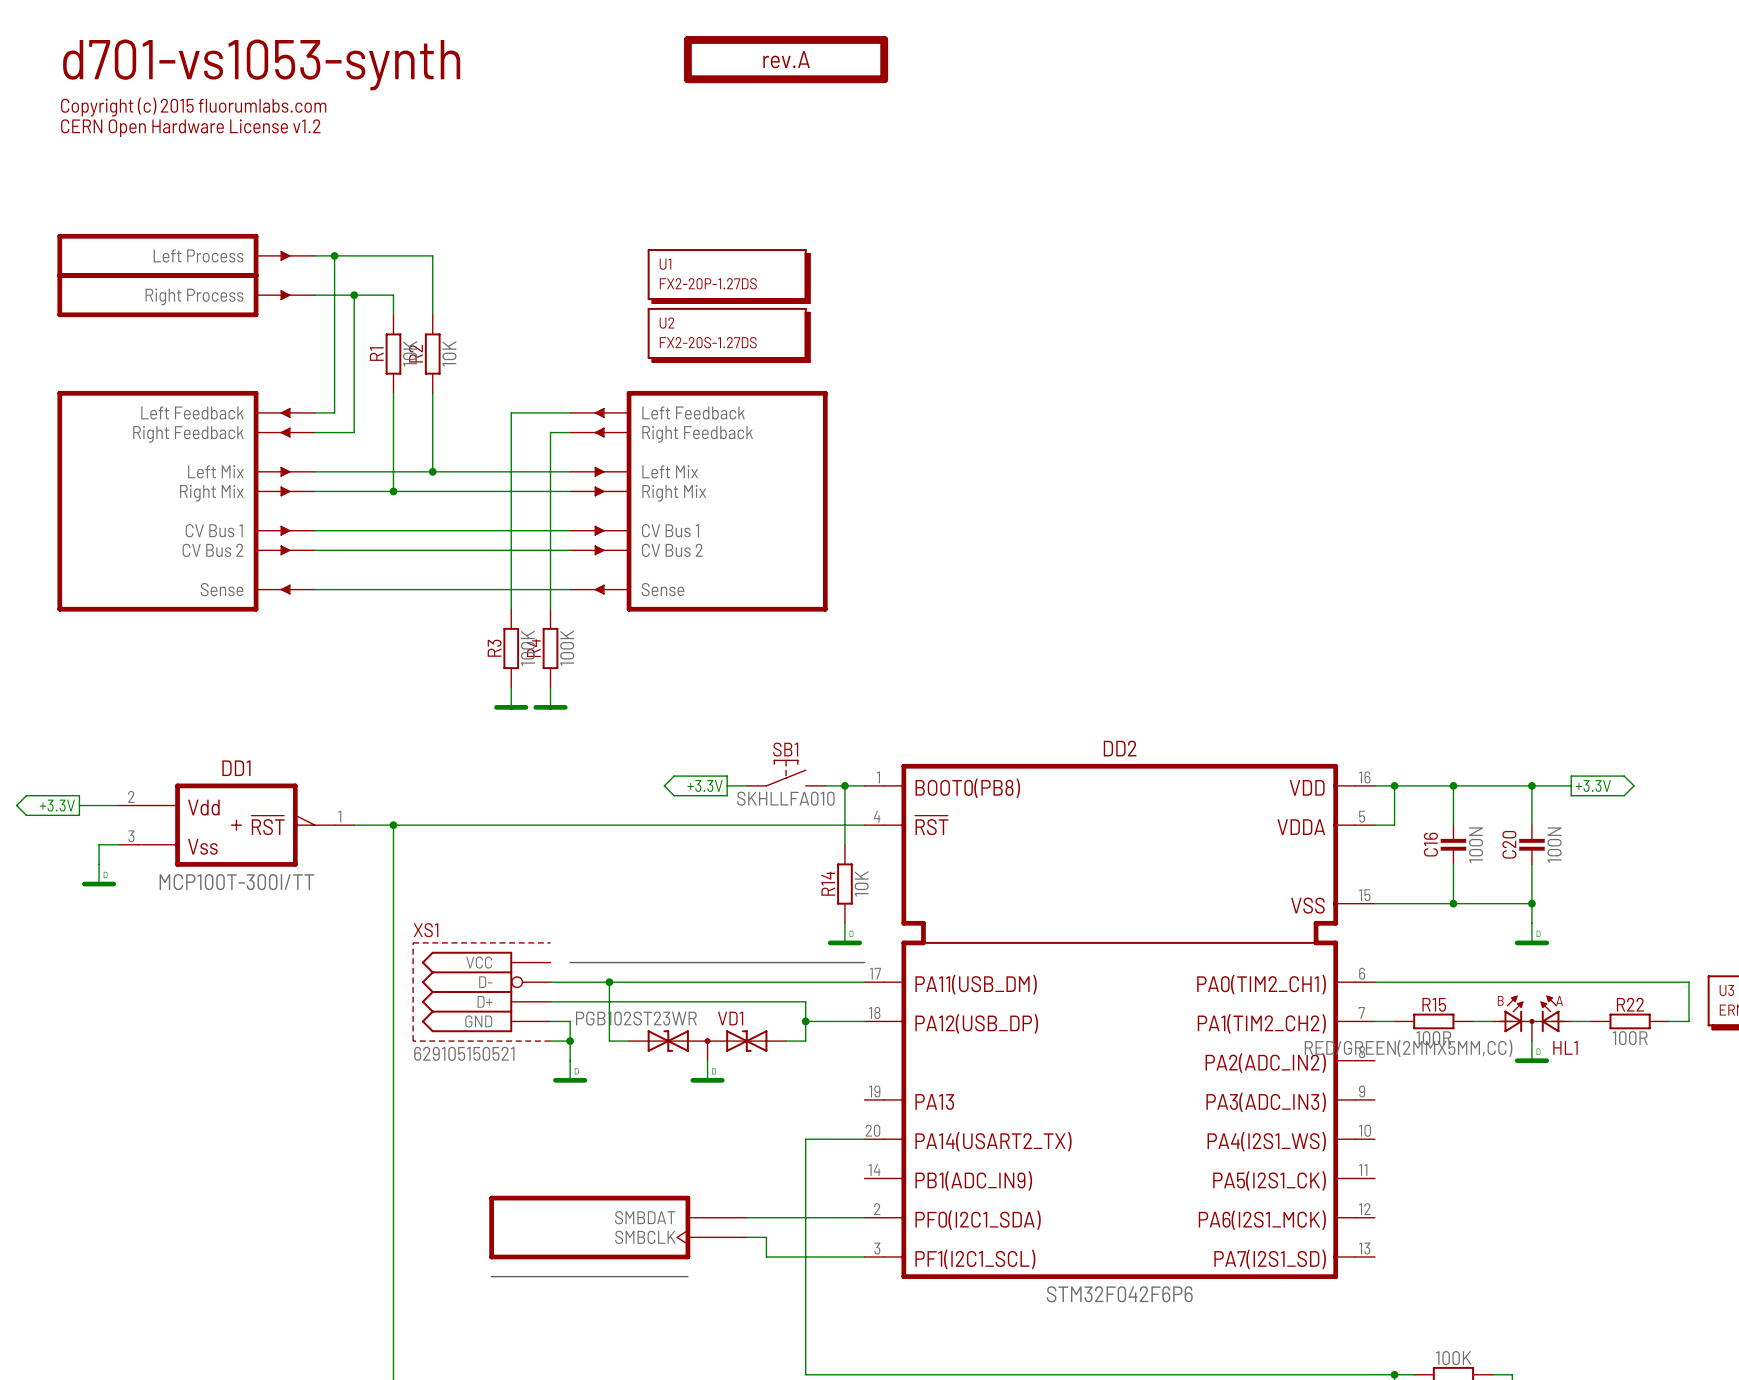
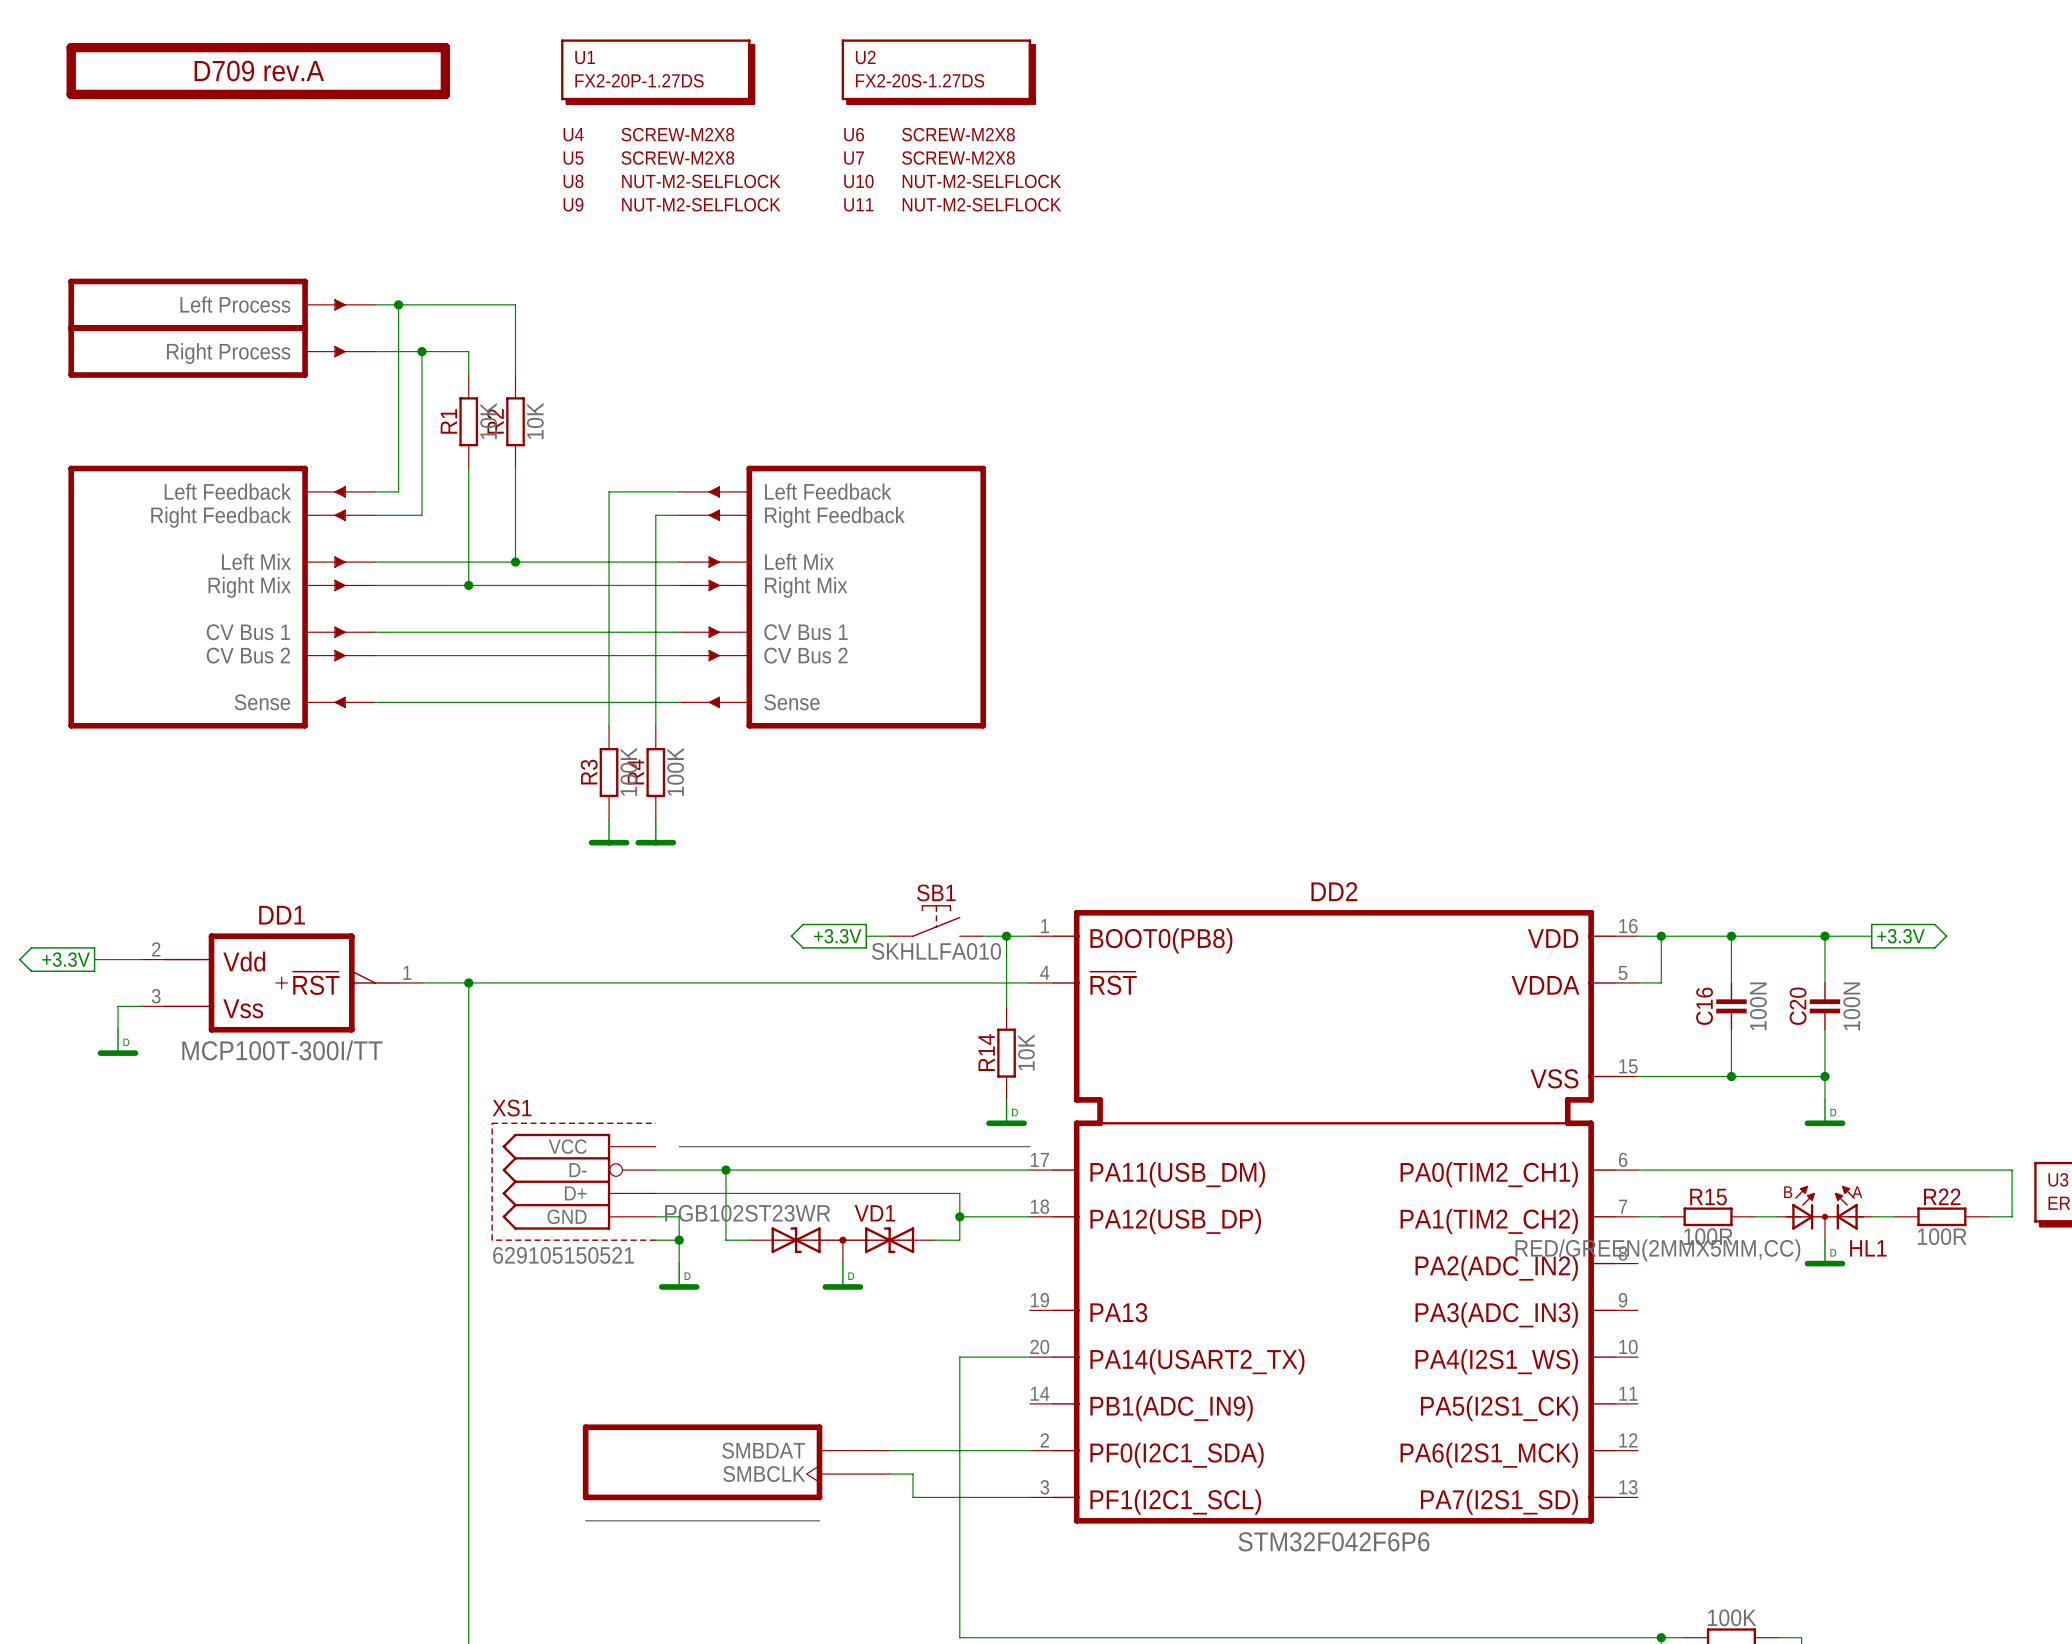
part: none -> D709 rev.A (258, 71)
part: rev.A (786, 59) -> none
part: (260, 88) -> none
U4: none -> SCREW-M2X8 (648, 134)
U6: none -> SCREW-M2X8 (929, 134)
U5: none -> SCREW-M2X8 (648, 158)
U7: none -> SCREW-M2X8 (929, 158)
U8: none -> NUT-M2-SELFLOCK (672, 181)
U10: none -> NUT-M2-SELFLOCK (952, 181)
U9: none -> NUT-M2-SELFLOCK (672, 204)
U11: none -> NUT-M2-SELFLOCK (952, 204)
U1 position: (729, 276) -> (658, 72)
U2 position: (729, 335) -> (938, 72)

